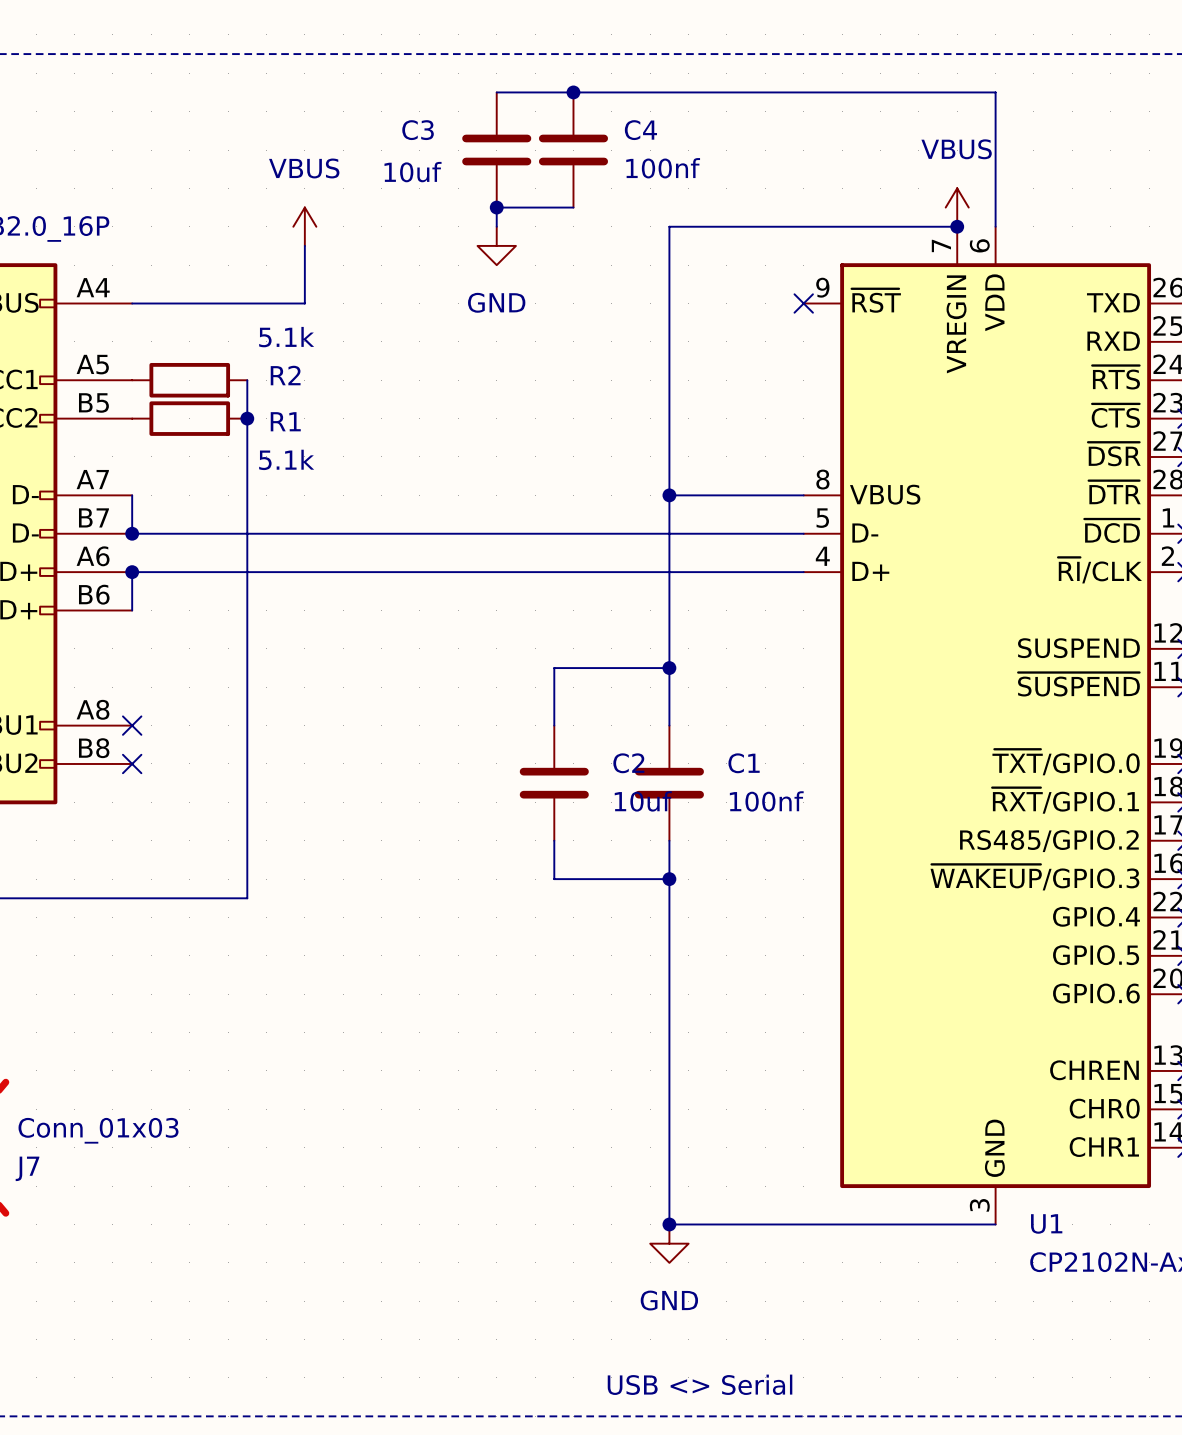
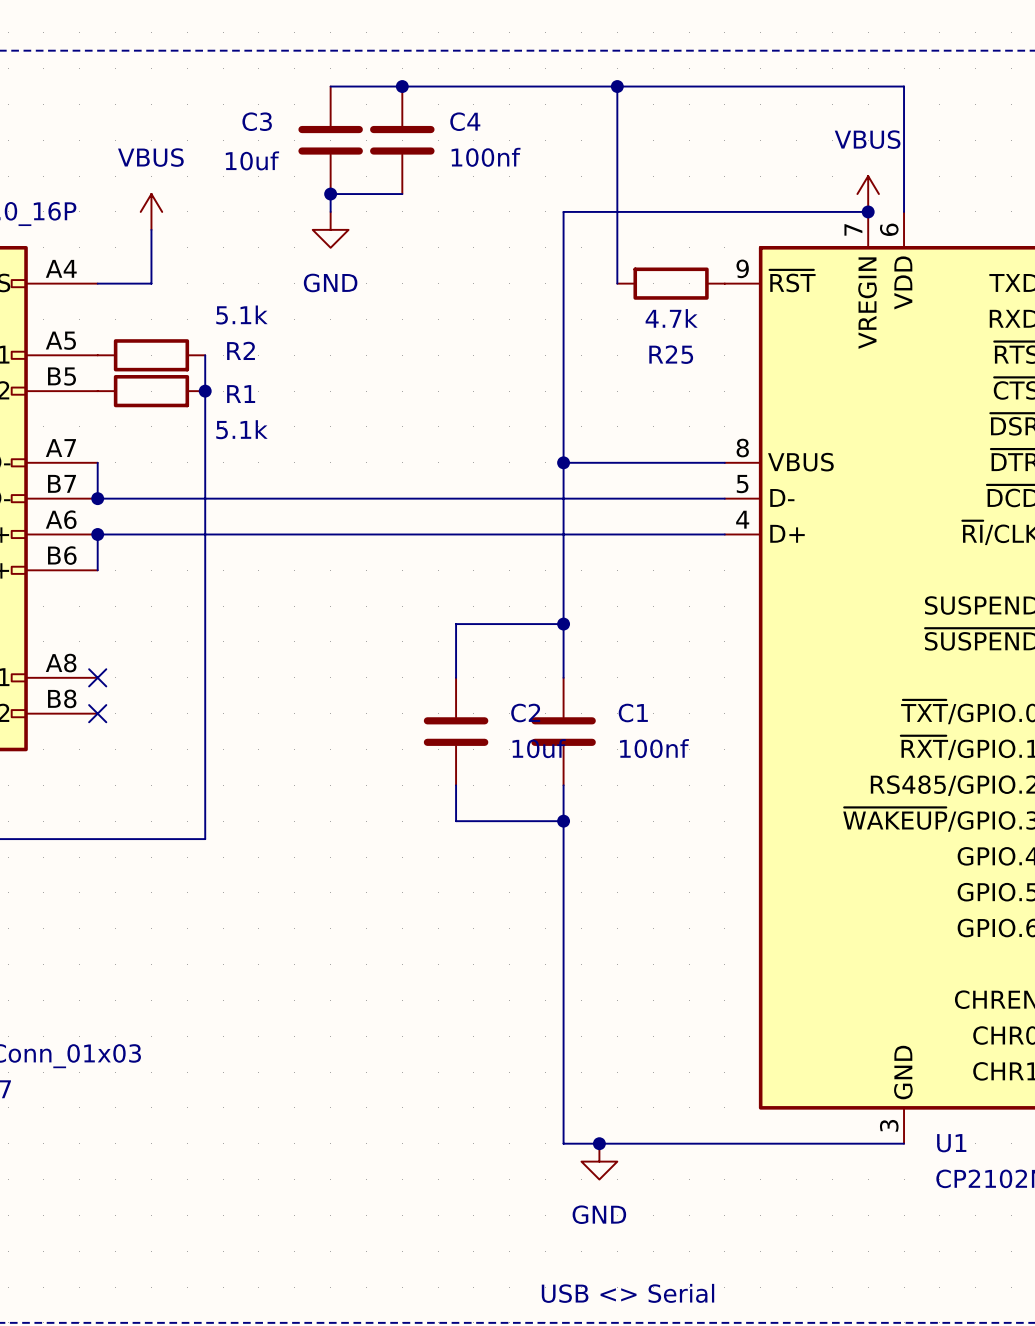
wire: none -> (330, 86) (438, 86)
junction: none -> (402, 86)
junction: (573, 92) -> none
wire: none -> (617, 86) (617, 283)
junction: none -> (617, 86)
C3 position: (496, 150) -> (330, 140)
C4 position: (573, 150) -> (402, 140)
junction: none -> (330, 194)
junction: (496, 207) -> none
wire: (573, 207) (496, 207) (496, 226) -> (402, 194) (330, 194) (330, 211)
power symbol position: VBUS (304, 226) -> VBUS (151, 211)
wire: (669, 226) (669, 725) -> (599, 211) (563, 211) (563, 677)
wire: (304, 245) (304, 303) (189, 303) -> (151, 229) (151, 283)
power symbol position: GND (496, 245) -> GND (330, 229)
R25: none -> 4.7k (671, 283)
no-connect mark: (803, 303) -> none
junction position: (669, 495) -> (563, 462)
wire: (554, 668) (554, 725) -> (491, 624) (456, 624) (456, 677)
wire: (631, 668) (669, 668) -> (563, 462) (599, 462)
junction position: (669, 668) -> (563, 624)
C2 position: (554, 783) -> (456, 731)
C1 position: (669, 783) -> (563, 731)
wire: (554, 840) (554, 879) -> (456, 785) (456, 821) (491, 821)
wire: (669, 840) (669, 1224) -> (563, 785) (563, 1143) (599, 1143)
wire: (631, 879) (669, 879) -> none
junction position: (669, 879) -> (563, 821)

